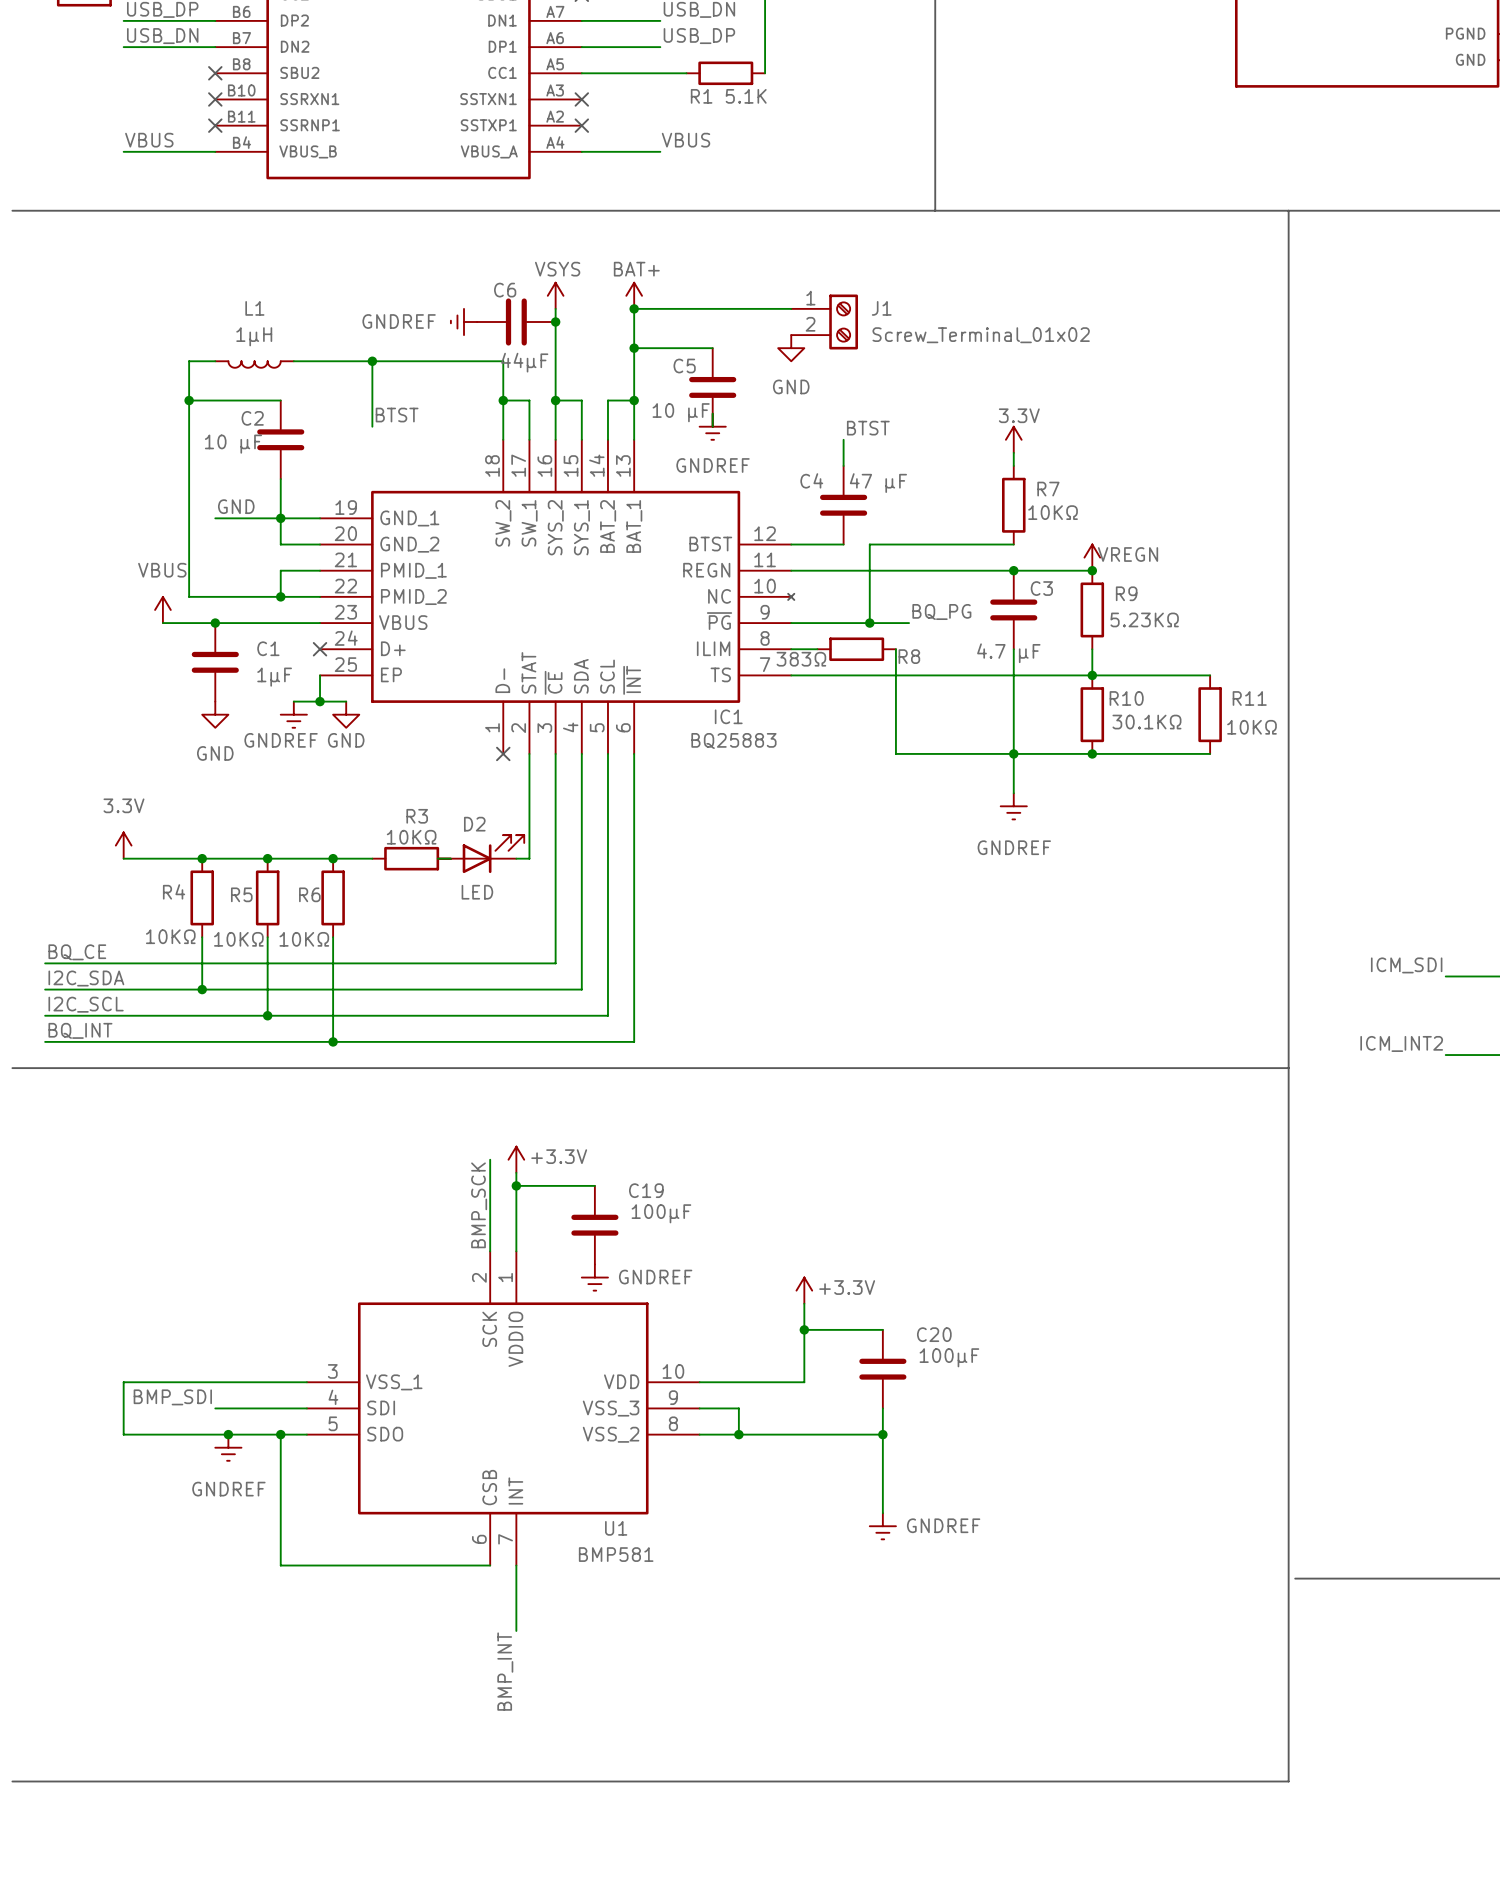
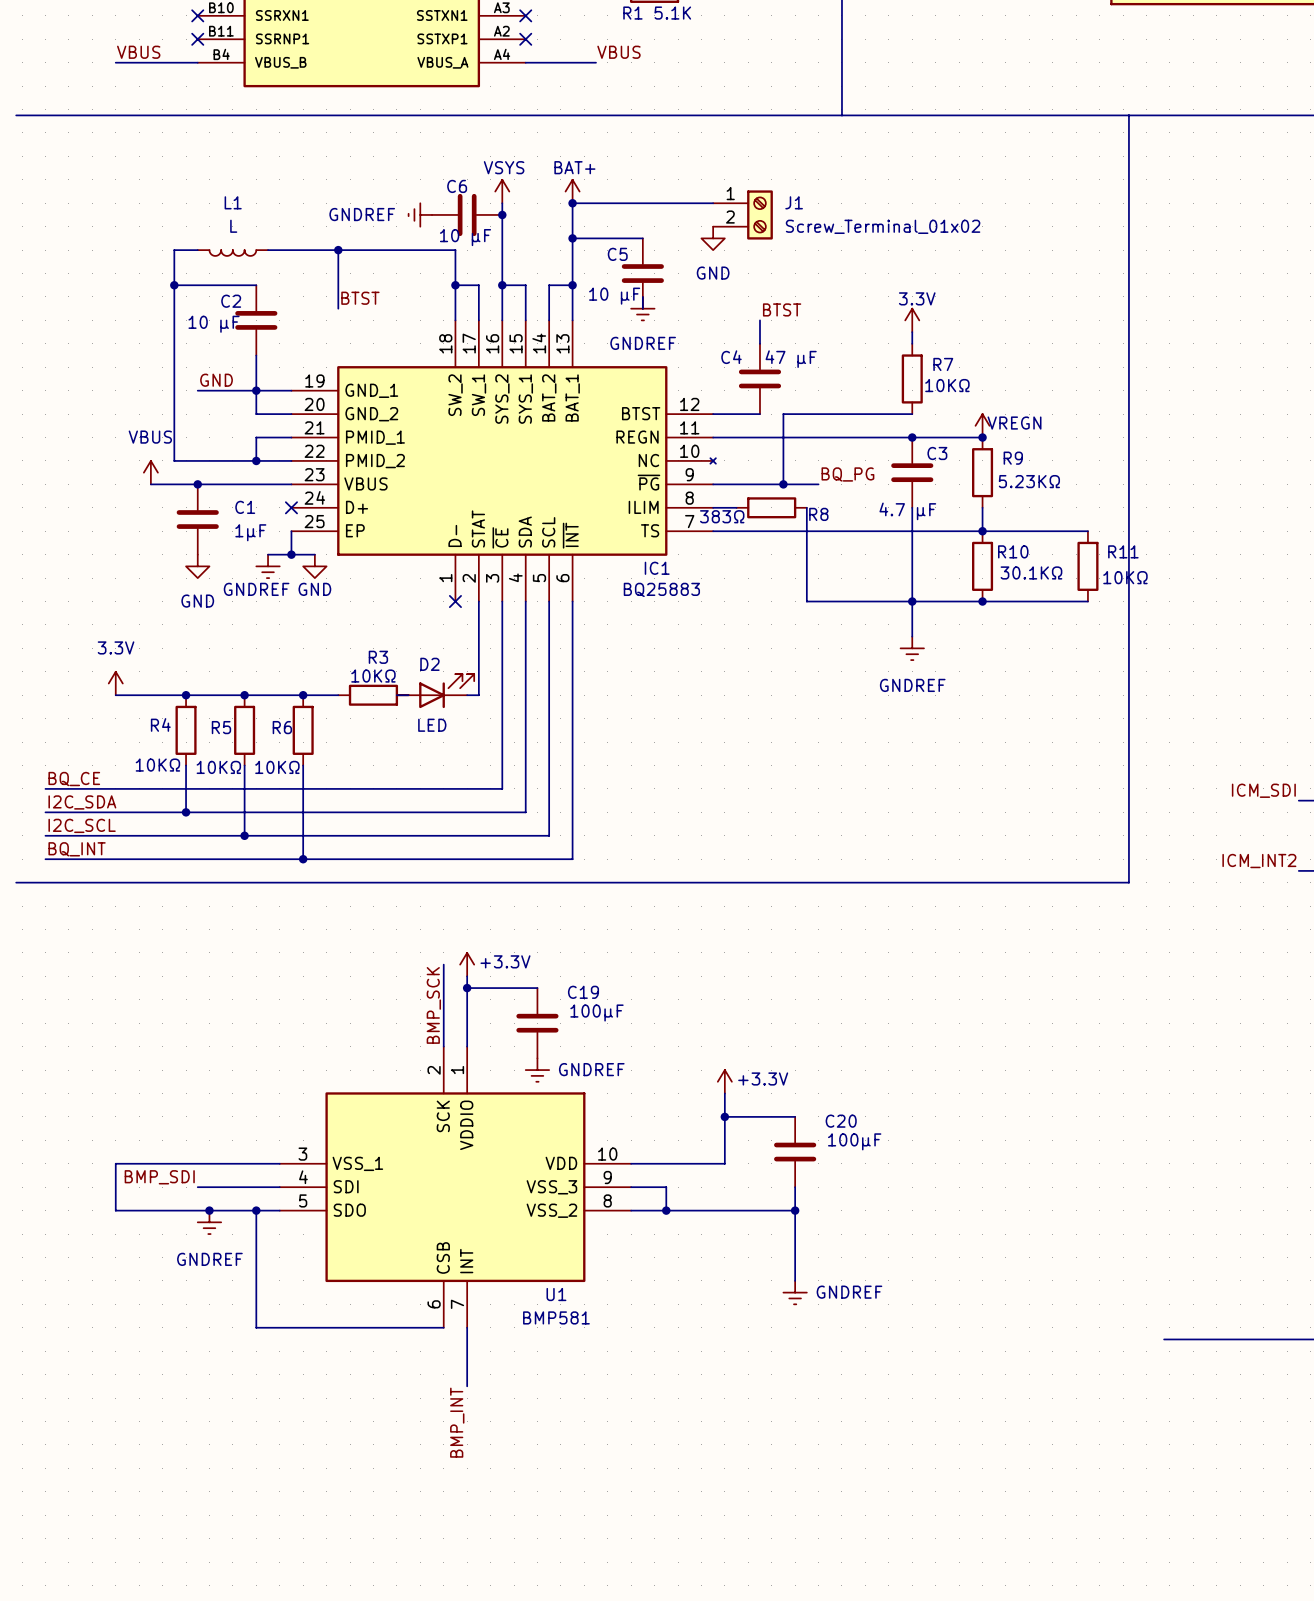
line: (1288, 210) (1288, 1781) (12, 1781) -> none
L1 value: 1μH (254, 336) -> L (233, 226)
C6 value: 44μF (524, 362) -> 10 μF (465, 237)
line: (1255, 1068) (1288, 1068) -> (1128, 882) (1128, 115)

